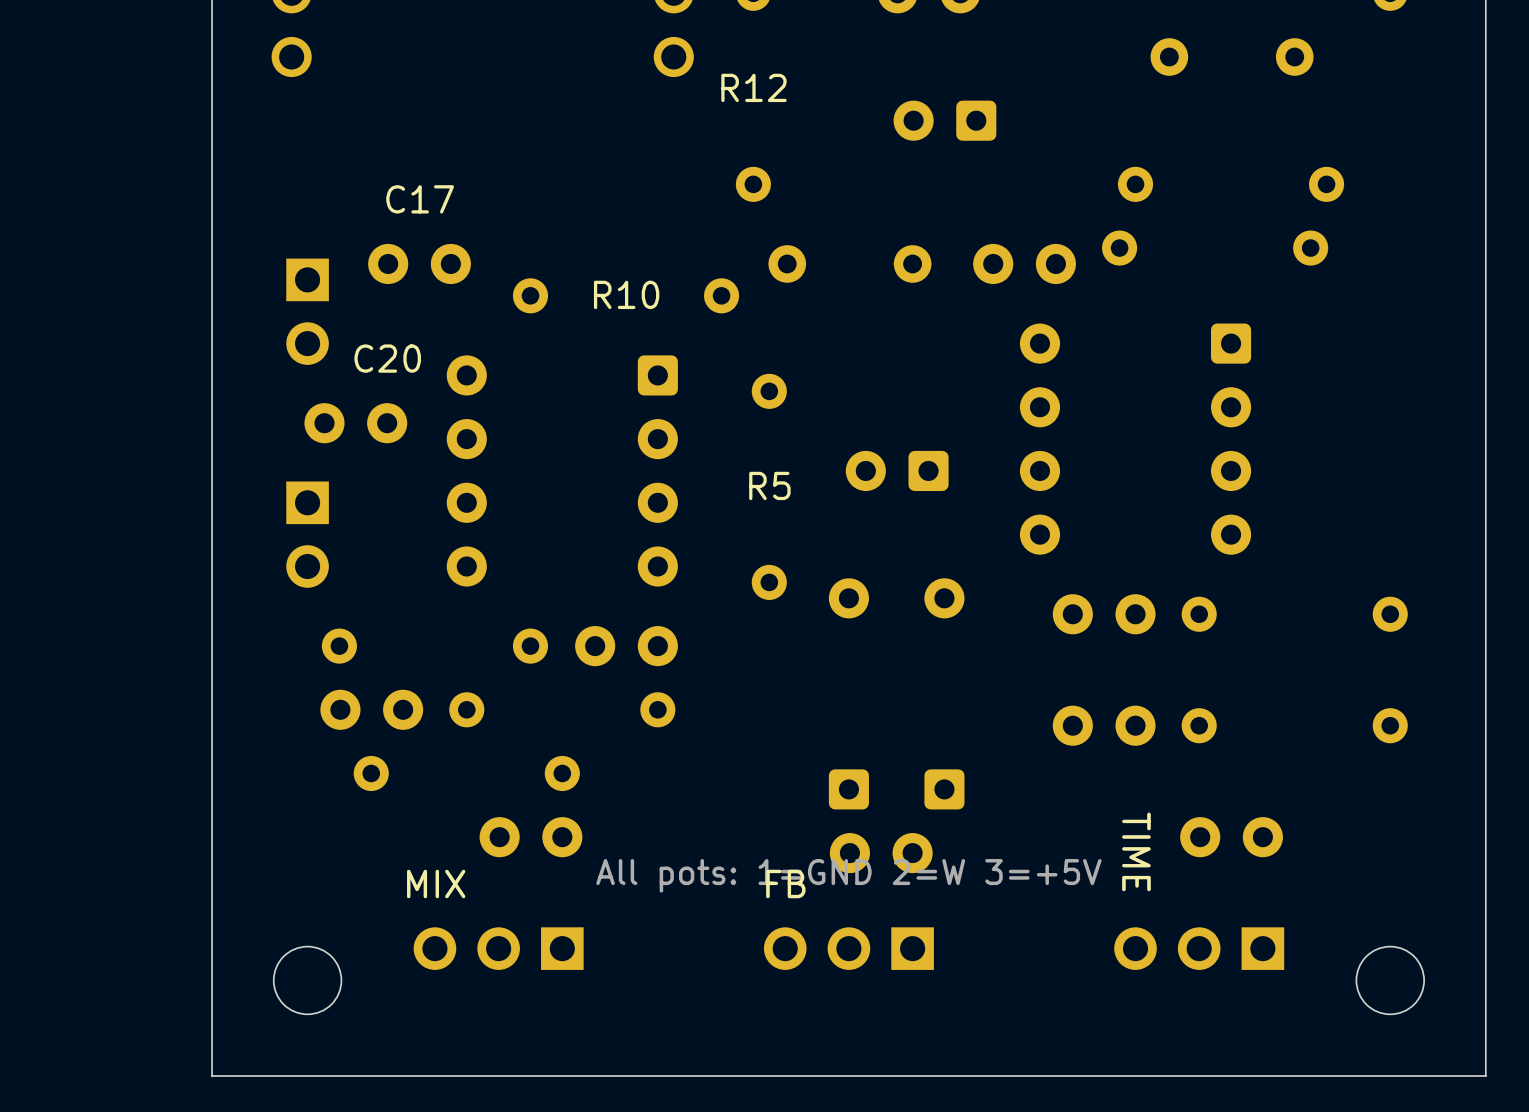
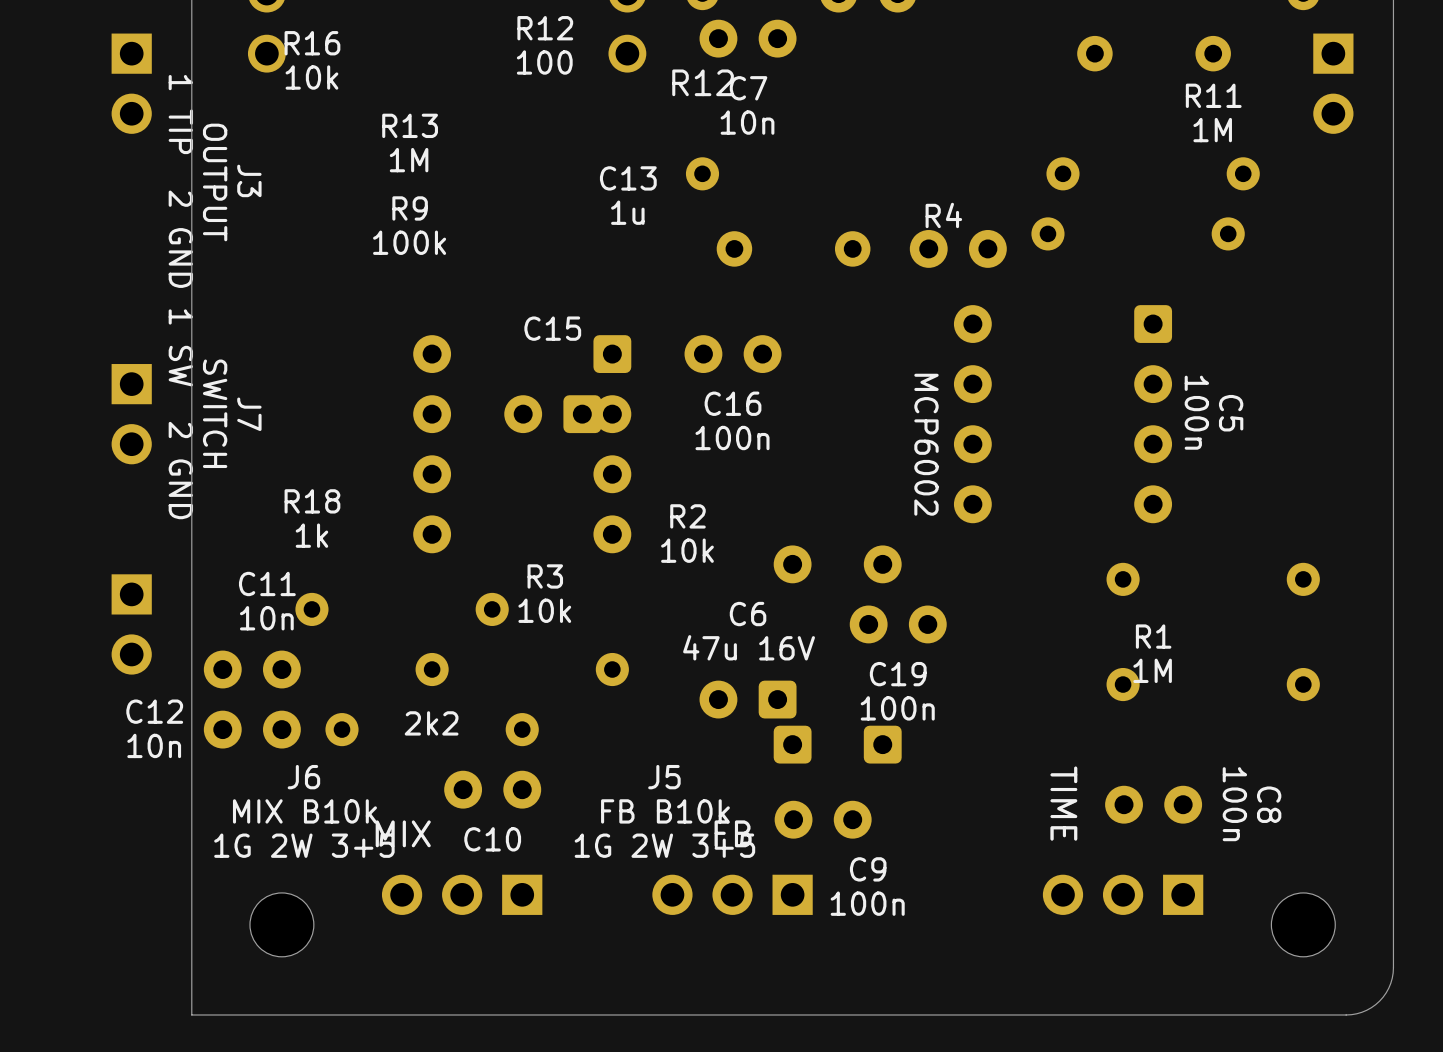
text: none -> R12 (545, 28)
part: none -> (748, 38)
text: none -> R16 (312, 43)
text: none -> 100 (544, 62)
text: none -> 10k (311, 77)
part: none -> (131, 83)
part: none -> (1333, 83)
text: none -> C7 (748, 88)
text: none -> R11 (1213, 95)
part: (944, 120) -> none
text: none -> 10n (747, 122)
text: none -> R13 (410, 125)
text: none -> 1M (1212, 130)
text: none -> 1M (409, 160)
text: none -> C13 (628, 178)
text: none -> J3 (249, 180)
text: none -> 1 TIP 2 GND (180, 181)
text: none -> OUTPUT (215, 182)
text: none -> R9 (410, 208)
text: none -> 1u (627, 212)
text: none -> R4 (943, 215)
text: none -> 100k (409, 242)
C17: (419, 263) -> none
R10: (626, 295) -> none
part: (307, 311) -> none
text: none -> C15 (552, 328)
part: none -> (733, 354)
C20: (355, 423) -> none
text: none -> C16 (733, 403)
text: none -> 100n (1196, 412)
text: none -> SWITCH (215, 413)
text: none -> C5 (1231, 413)
part: none -> (131, 414)
text: none -> 1 SW 2 GND (180, 414)
text: none -> J7 (249, 414)
part: none -> (552, 414)
text: none -> 100n (732, 438)
part: (897, 470) -> none
text: none -> MCP6002 (926, 444)
R5: (769, 486) -> none
text: none -> R18 (312, 501)
part: (307, 534) -> none
text: none -> R2 (687, 516)
text: none -> 1k (311, 535)
text: none -> 10k (687, 550)
text: none -> R3 (545, 576)
part: (1104, 614) -> none
text: none -> C11 (267, 583)
part: (626, 646) -> none
text: none -> 10k (544, 610)
text: none -> C6 (748, 614)
text: none -> 10n (266, 618)
part: none -> (131, 624)
part: none -> (898, 624)
text: none -> R1 (1153, 636)
text: none -> 47u 16V (749, 647)
part: none -> (252, 669)
part: (371, 709) -> none
text: none -> 1M (1152, 670)
text: none -> C19 (898, 674)
part: (1104, 725) -> none
part: none -> (748, 699)
text: none -> 100n (897, 708)
text: none -> C12 (154, 711)
text: none -> 2k2 (431, 723)
part: none -> (252, 729)
text: none -> 10n (154, 745)
text: none -> J6 (303, 777)
text: none -> J5 (664, 777)
part position: (1231, 837) -> (1153, 804)
text: none -> 100n (1234, 804)
part position: (881, 853) -> (823, 819)
text: none -> C8 (1269, 804)
text: none -> MIX B10k (304, 811)
text: none -> FB B10k (665, 811)
text: All pots: 1=GND 2=W 3=+5V (848, 875) -> none
text: none -> C10 (492, 839)
text: none -> 1G 2W 3+5 (304, 845)
text: none -> 1G 2W 3+5 (664, 845)
text: none -> C9 (868, 869)
part position: (848, 948) -> (732, 894)
text: none -> 100n (867, 903)
board edge: (1485, 1025) (1485, 1075) (1435, 1075) -> (1393, 967) (1388, 988) (1379, 1001) (1366, 1010) (1346, 1014)

